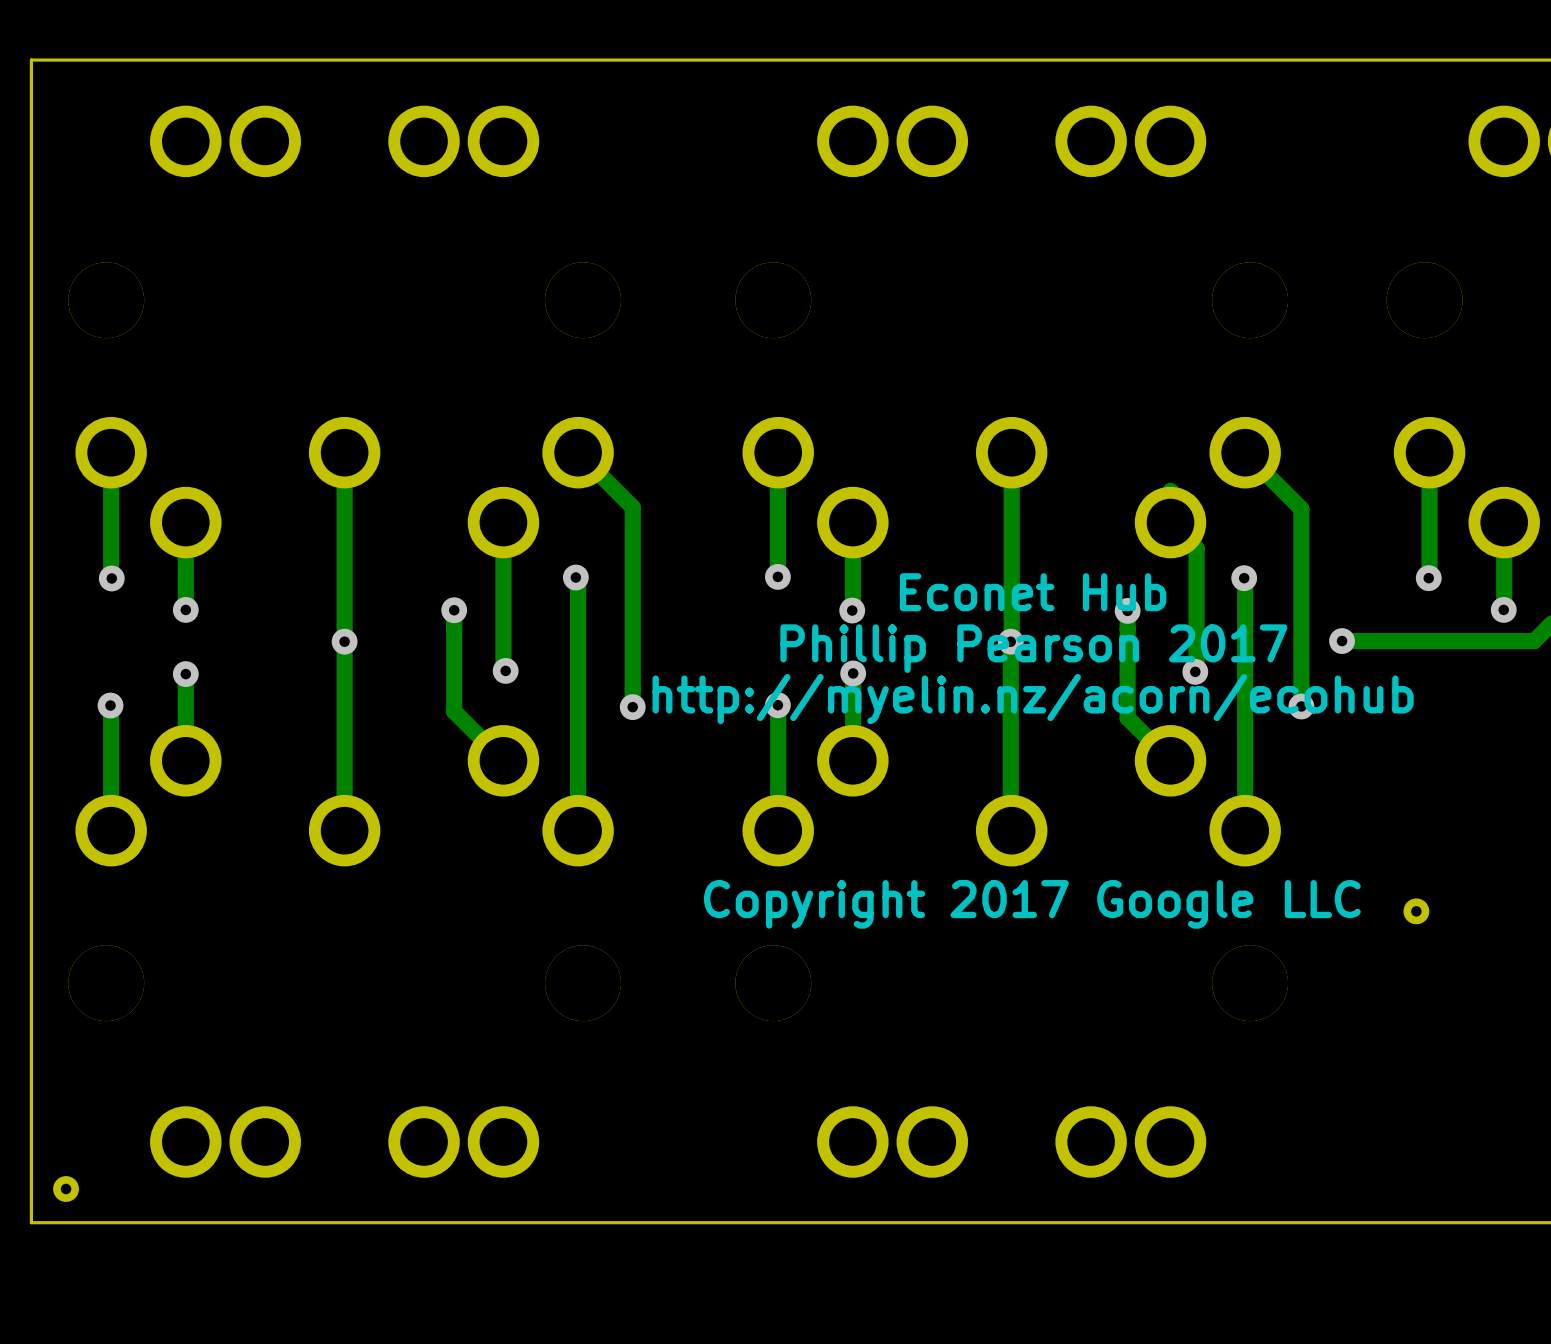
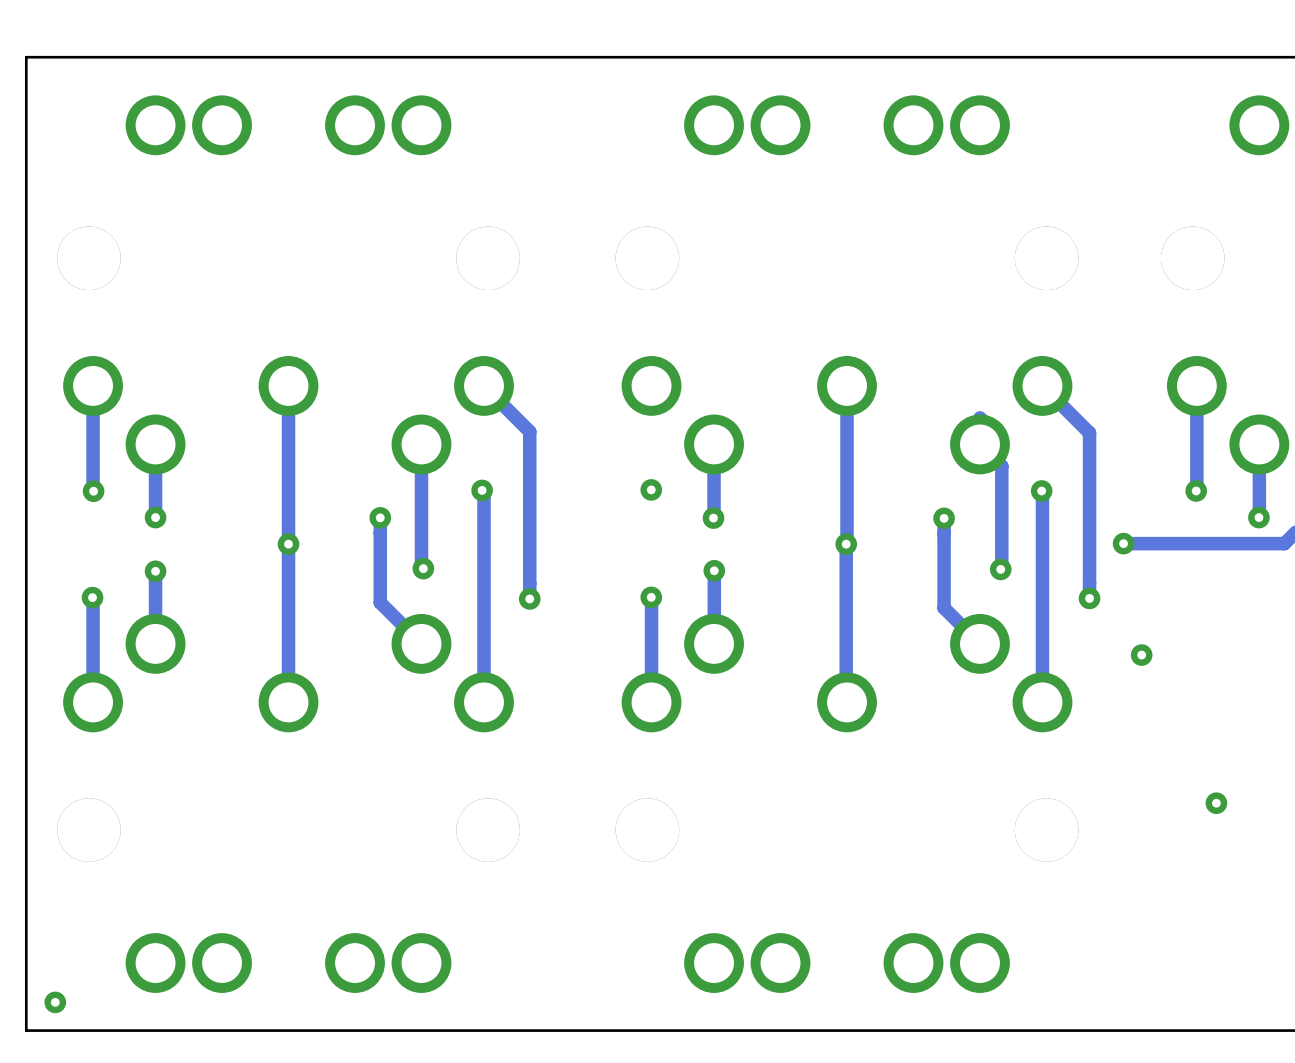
track: (777, 453) (777, 576) -> none
text: Econet Hub (1033, 592) -> none
text: Phillip Pearson 2017 (1033, 648) -> none
text: http://myelin.nz/acorn/ecohub (1033, 699) -> none
part: none -> (1141, 655)
text: Copyright 2017 Google LLC (1032, 904) -> none
part position: (1416, 911) -> (1216, 803)

